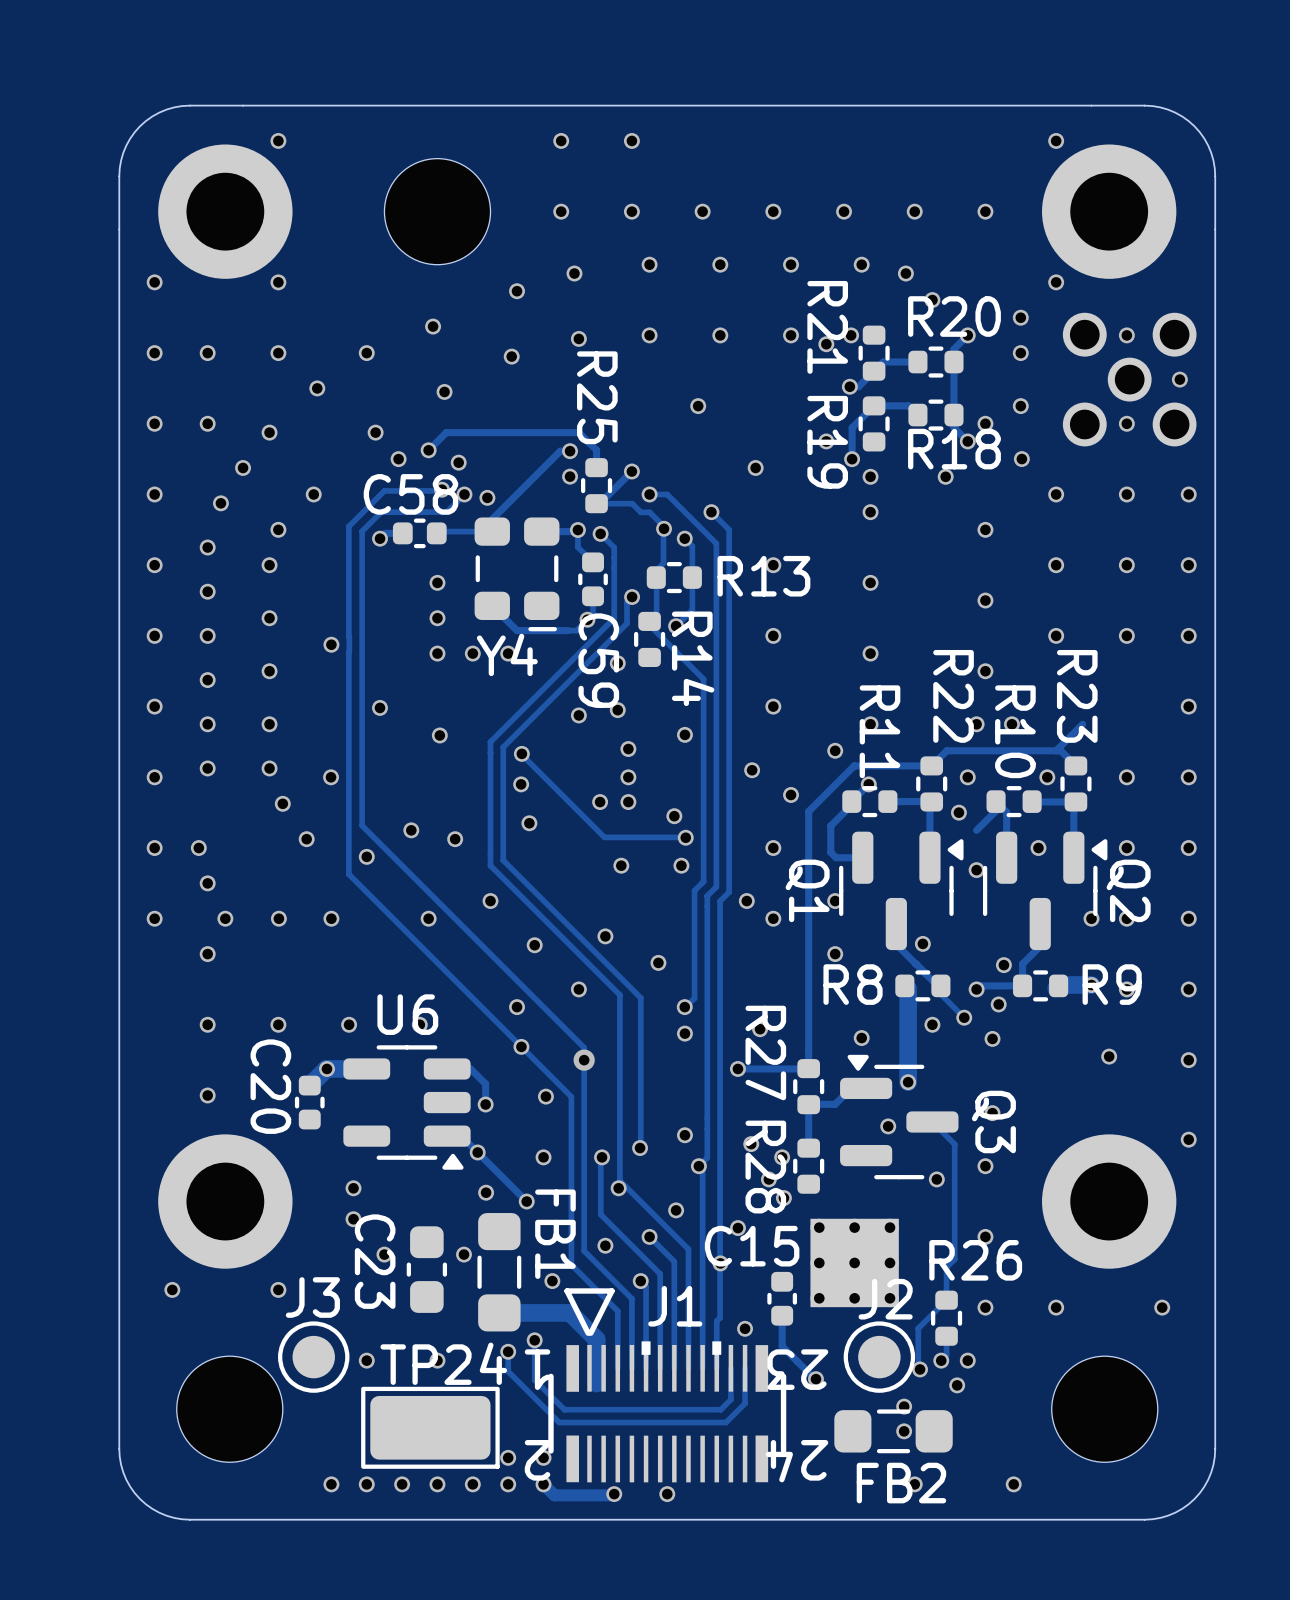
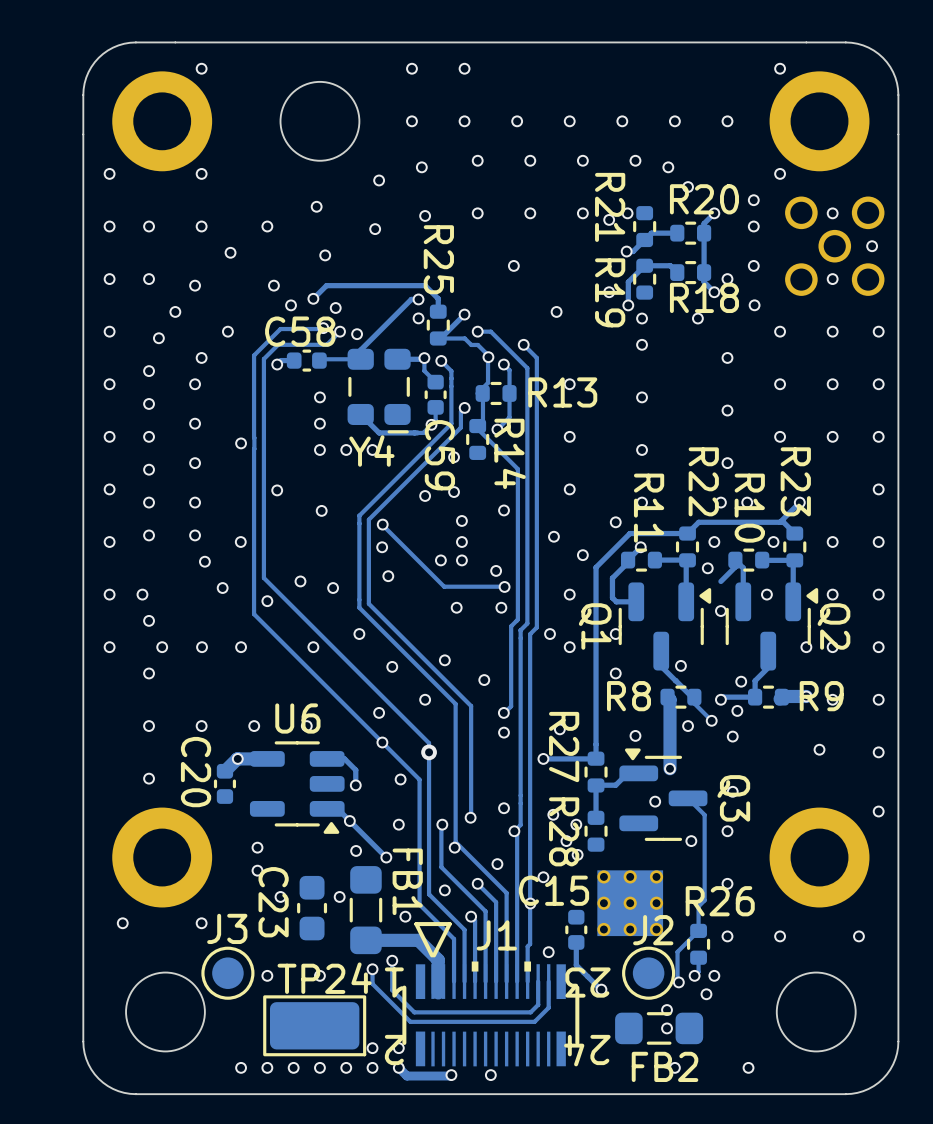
via: none -> (799, 502)

